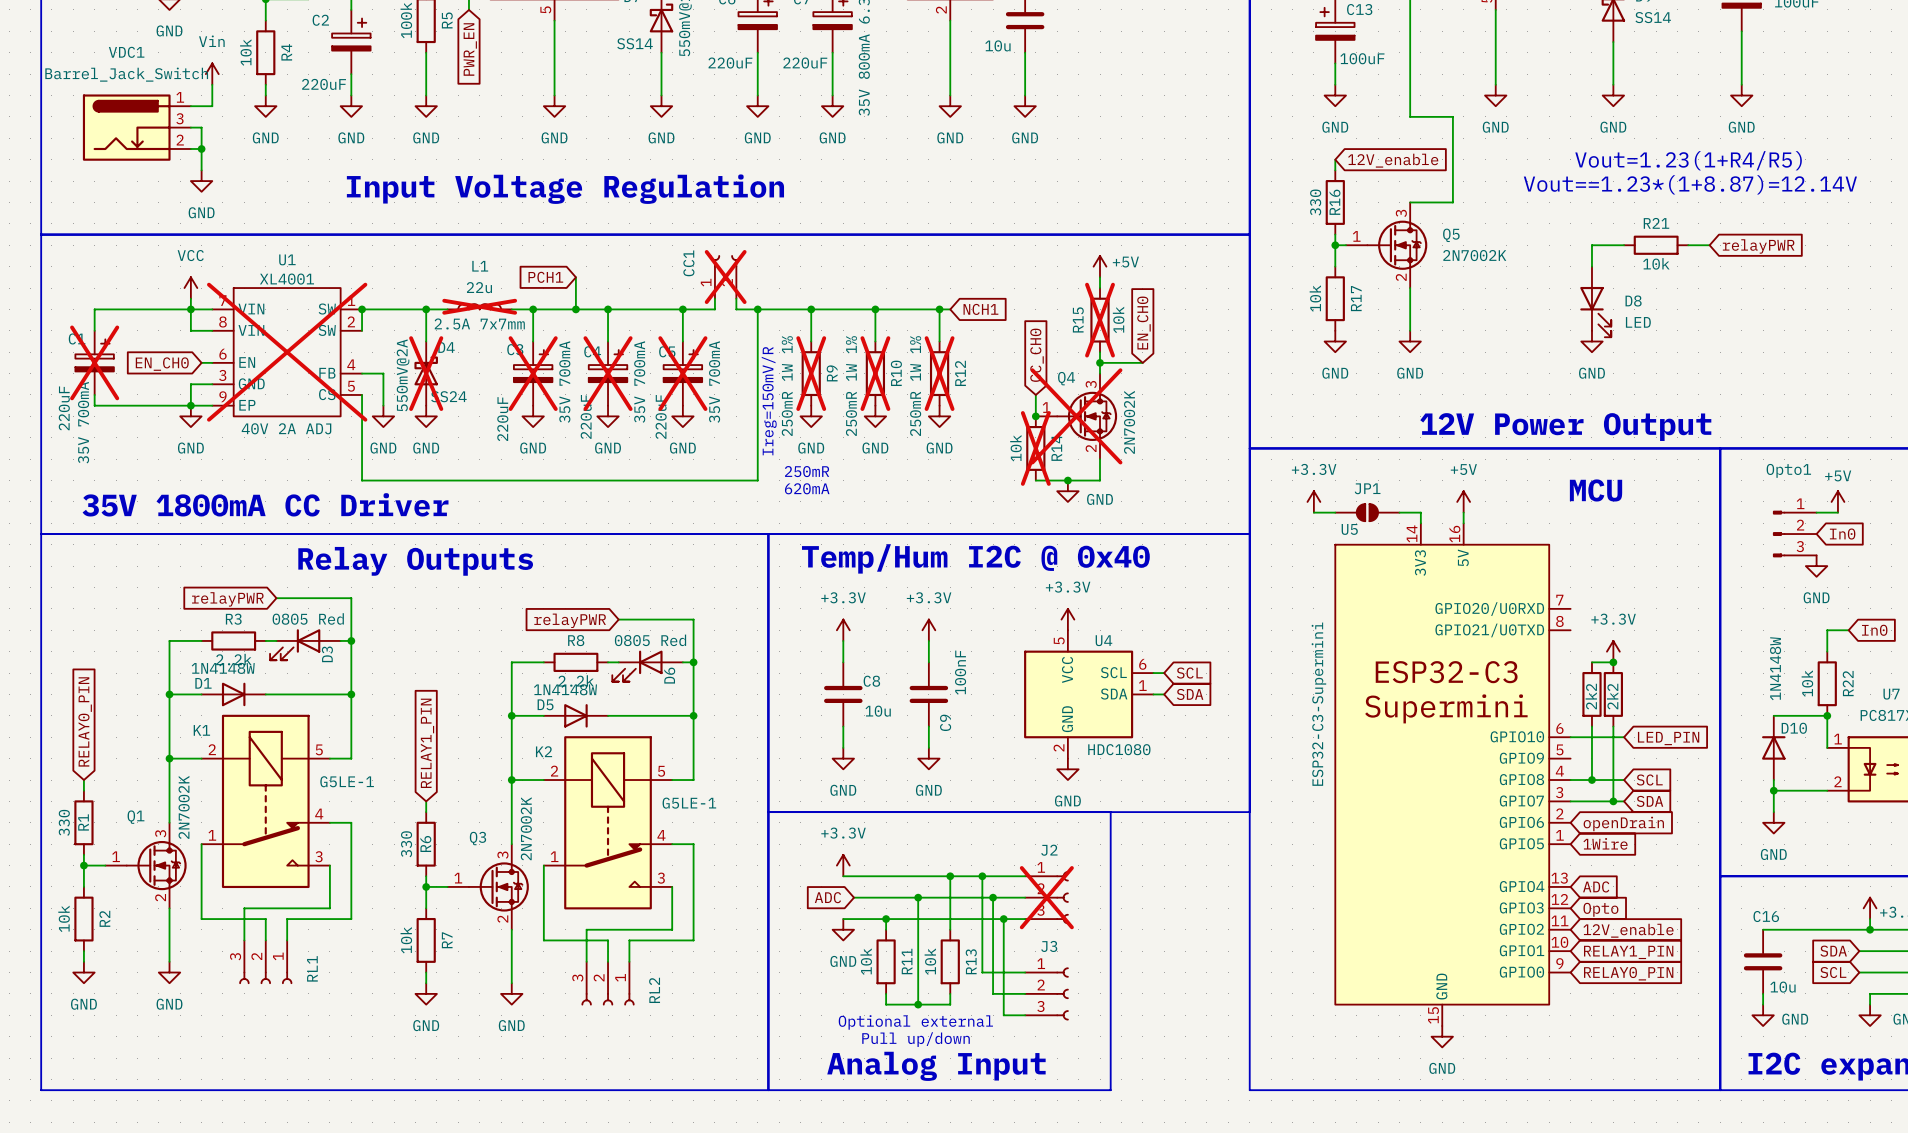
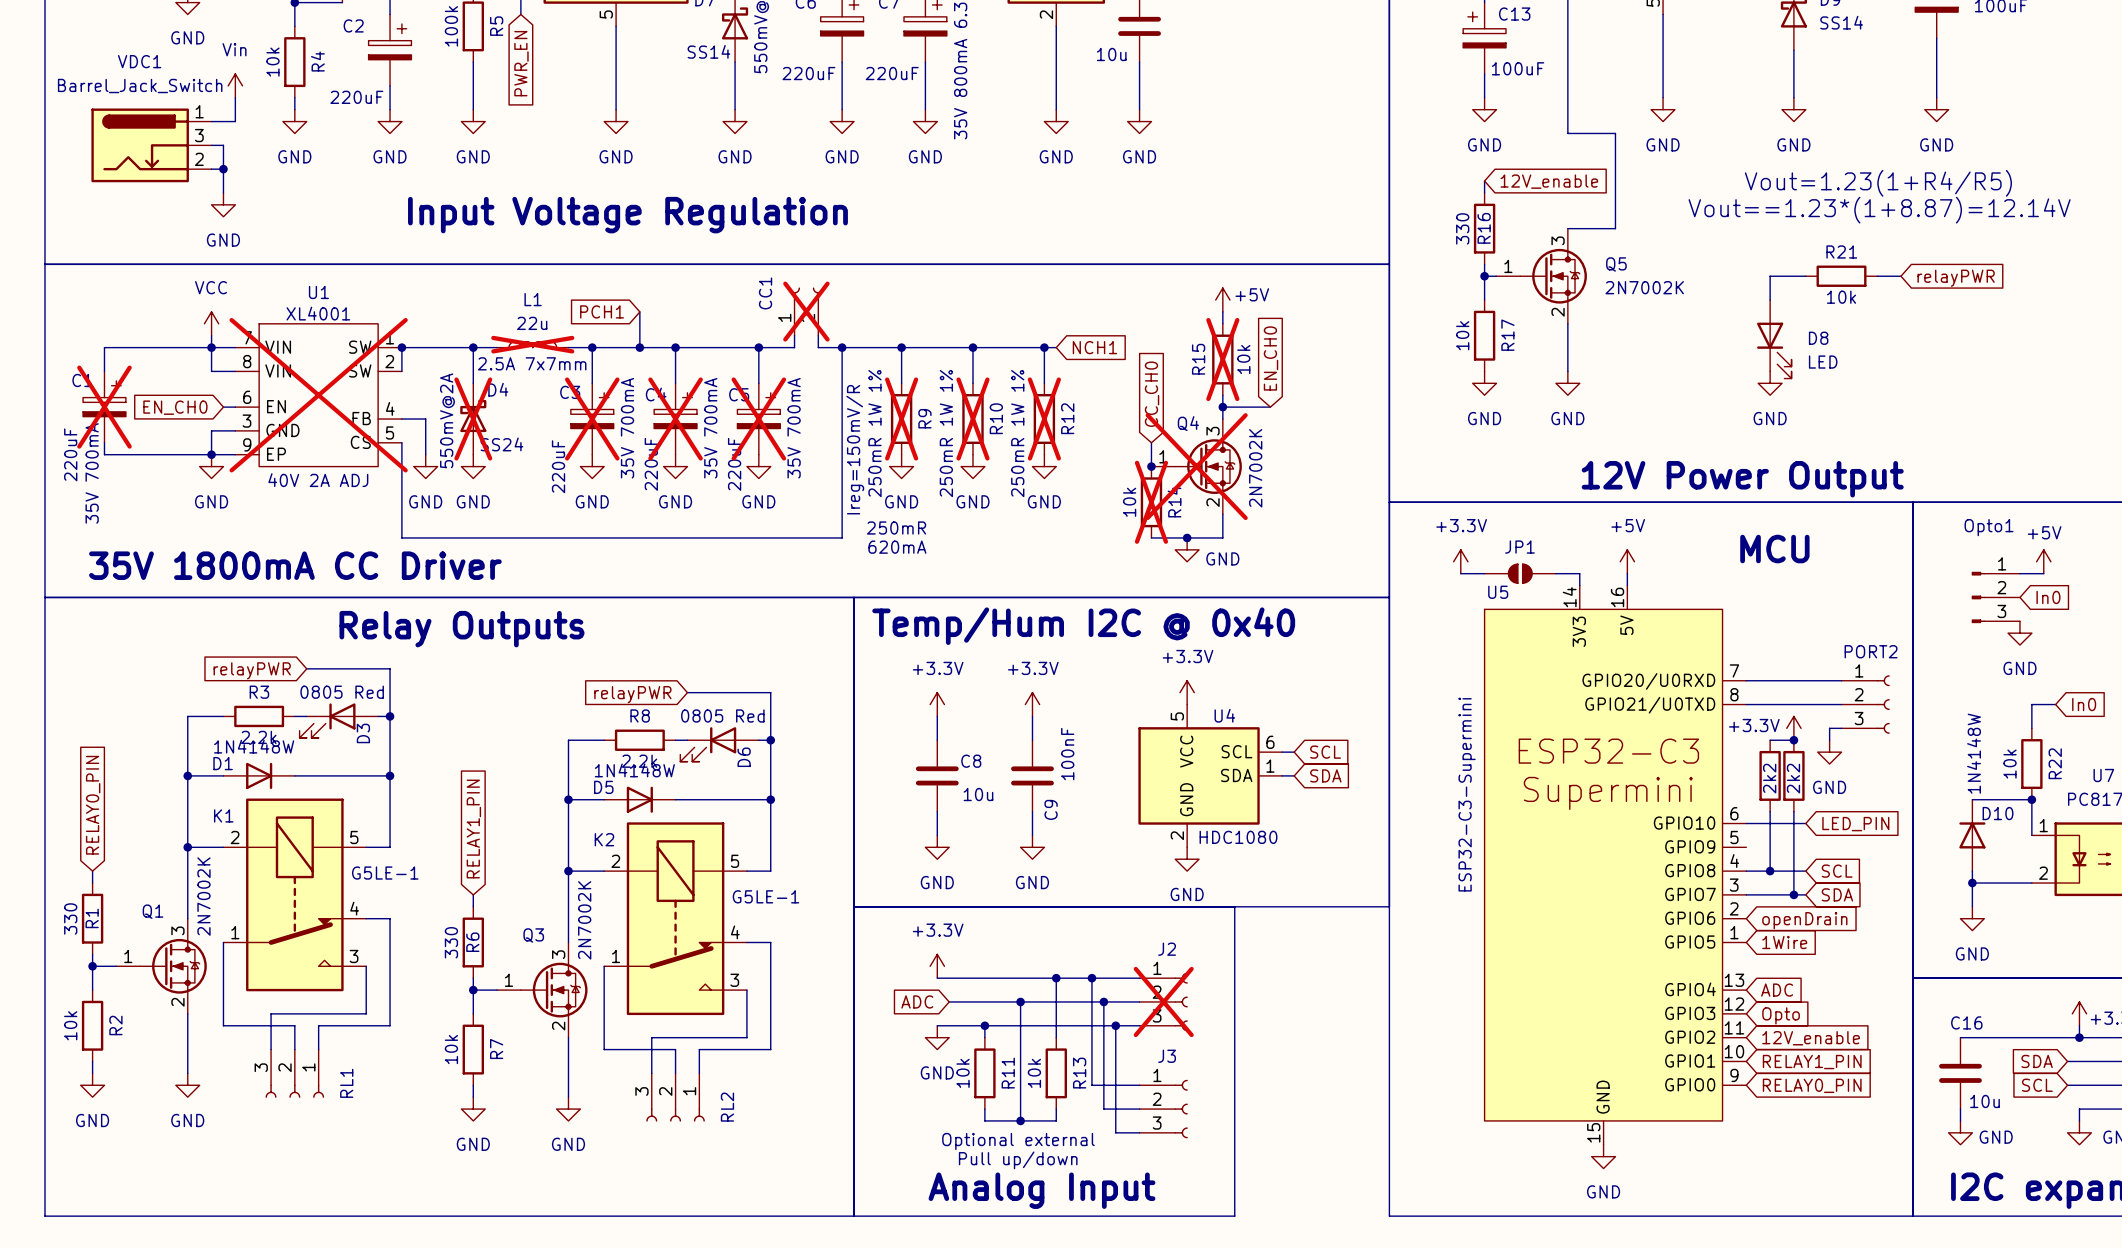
wire: none -> (1746, 680) (1841, 680)
power symbol text position: +3.3V (1613, 619) -> +3.3V (1754, 725)
wire: none -> (1746, 704) (1841, 704)
PORT2: none -> (1865, 704)
wire: none -> (1841, 728) (1829, 728) (1829, 740)
power symbol: none -> GND (1829, 752)

